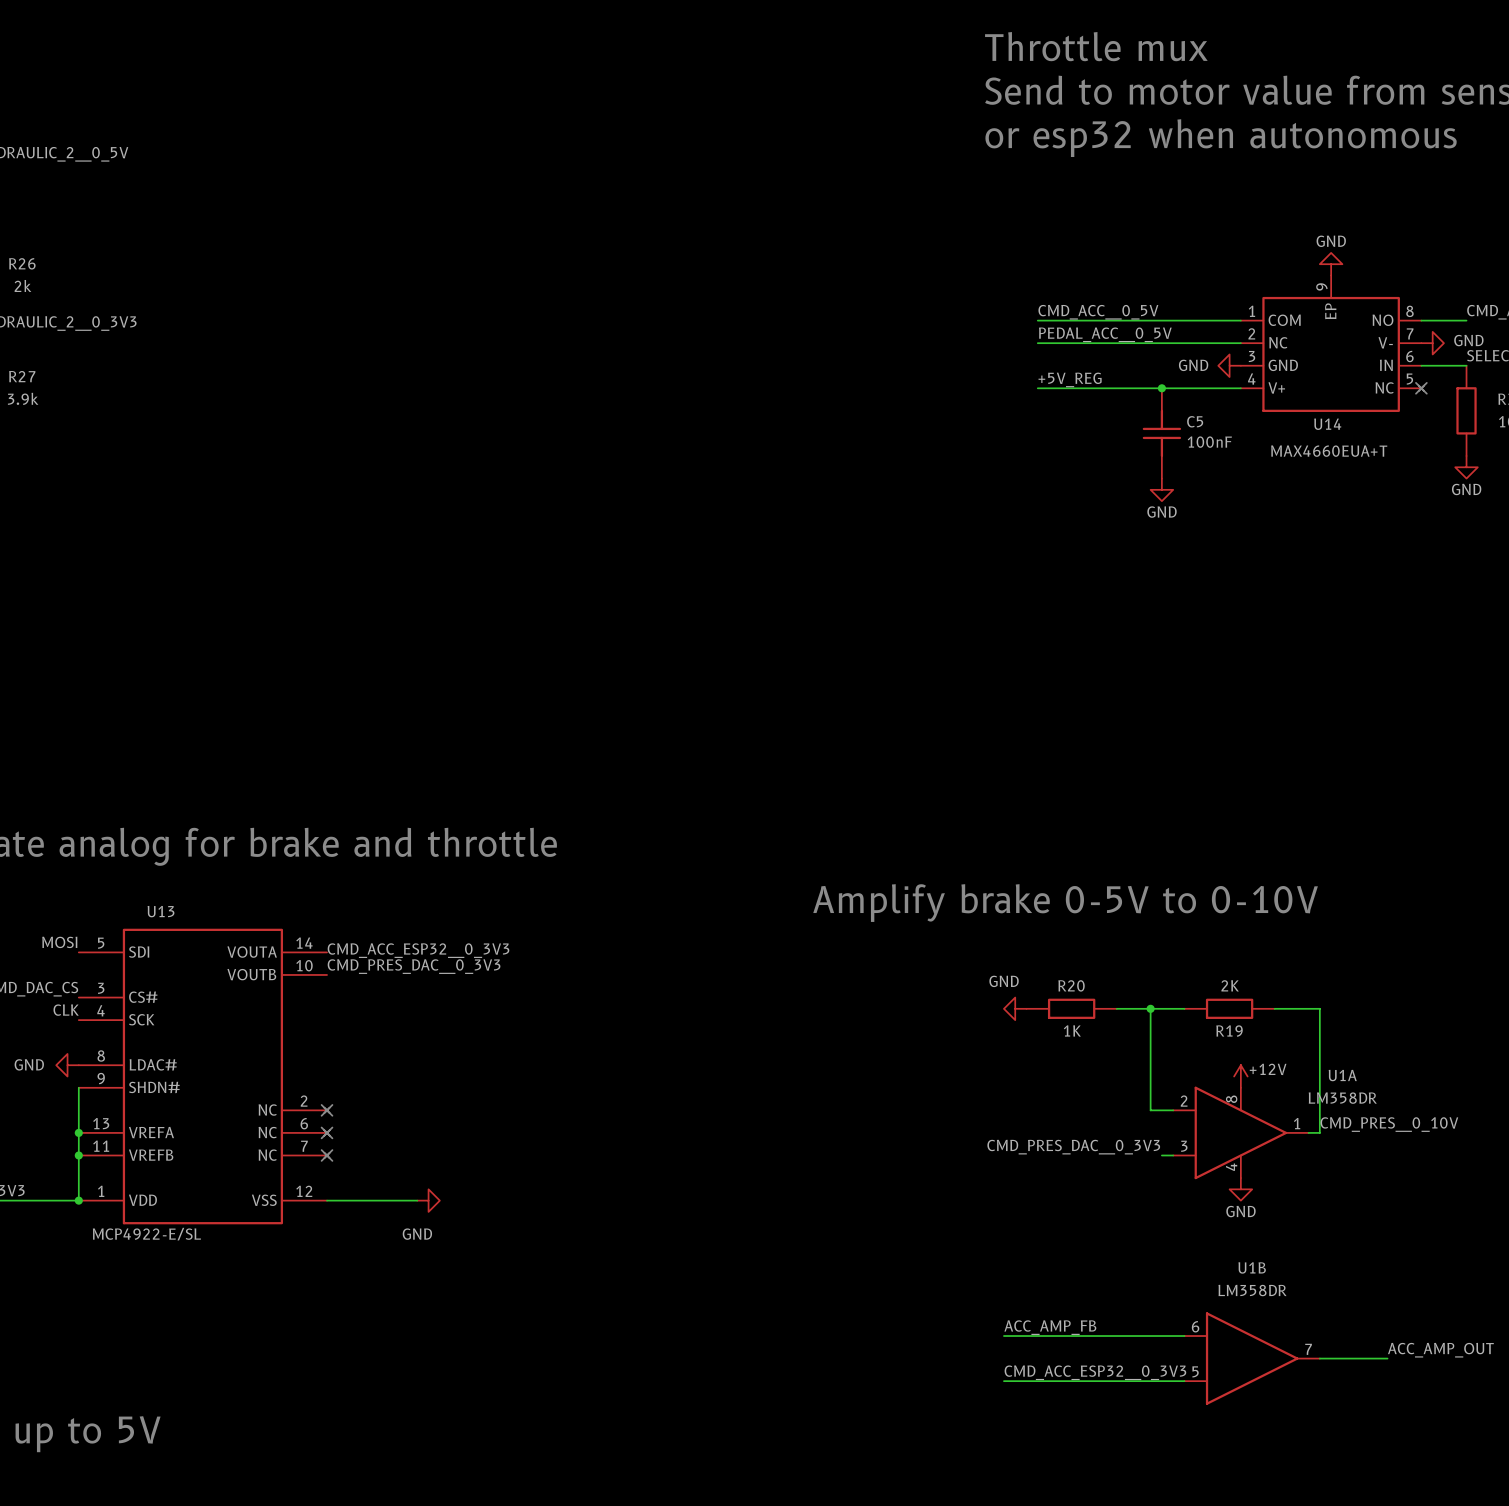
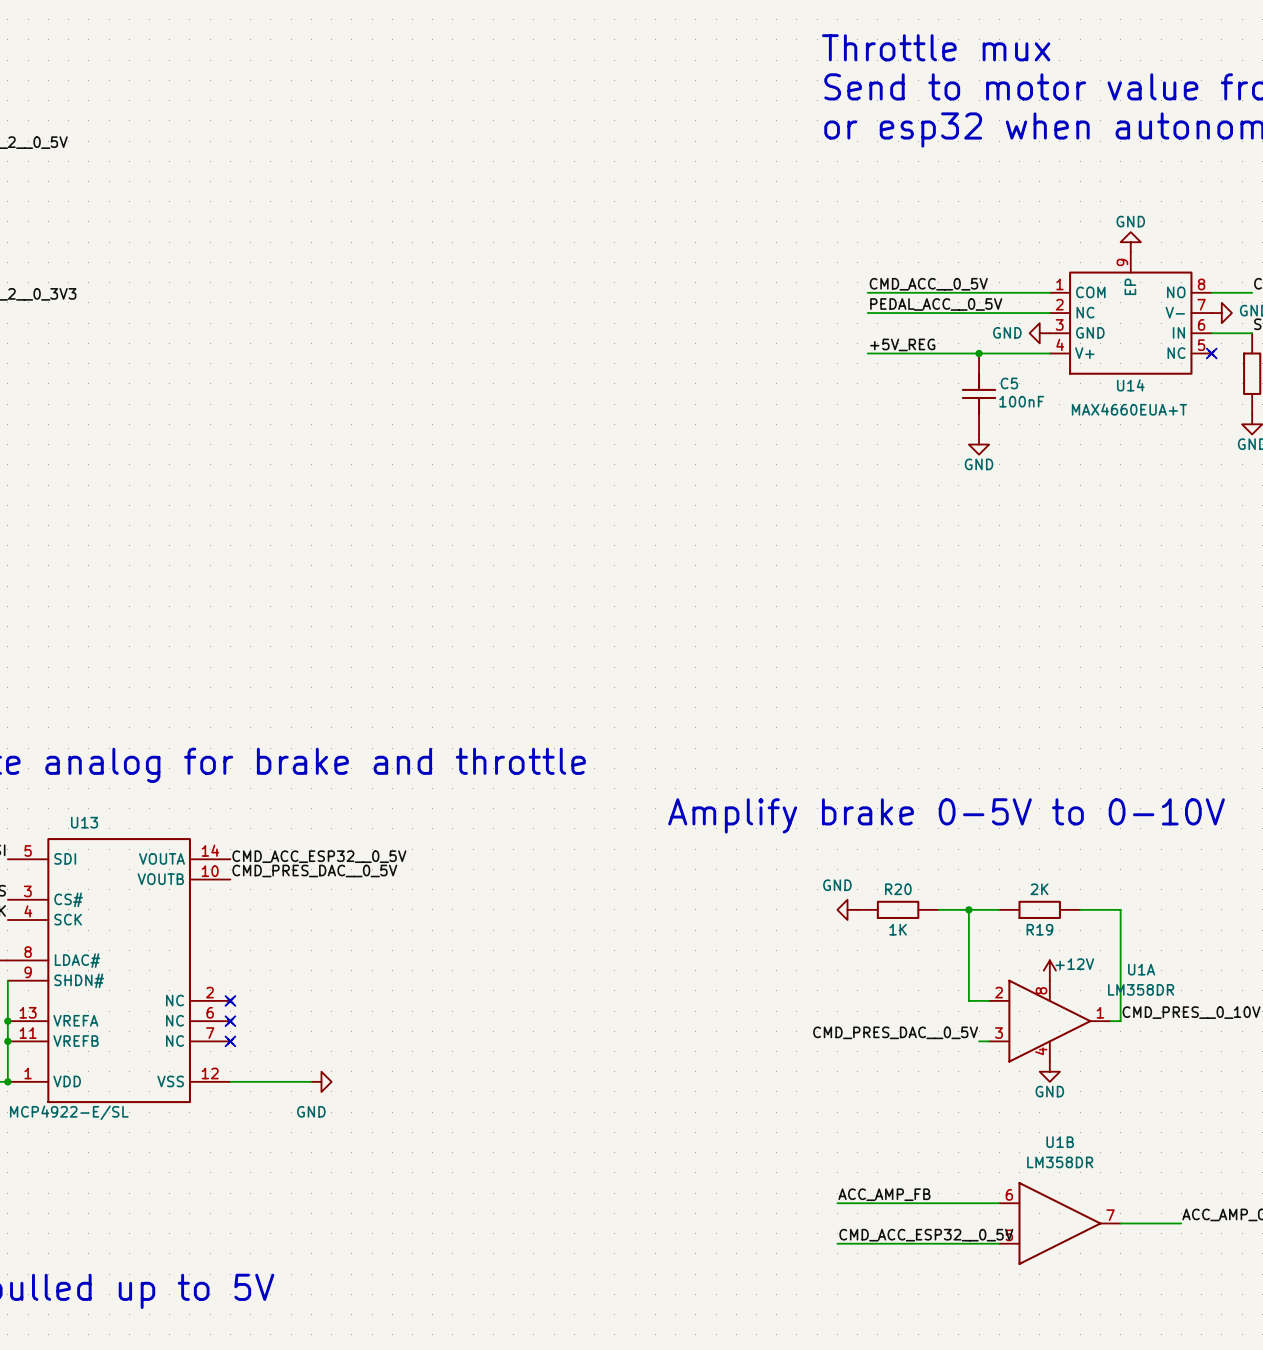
label: CMD_ACC_ESP32__0_3V3 (418, 950) -> CMD_ACC_ESP32__0_5V (319, 856)
label: CMD_PRES_DAC__0_3V3 (414, 966) -> CMD_PRES_DAC__0_5V (314, 870)
label: CMD_PRES_DAC__0_3V3 (1073, 1147) -> CMD_PRES_DAC__0_5V (895, 1032)
label: CMD_ACC_ESP32__0_3V3 (1095, 1372) -> CMD_ACC_ESP32__0_5V (926, 1235)

